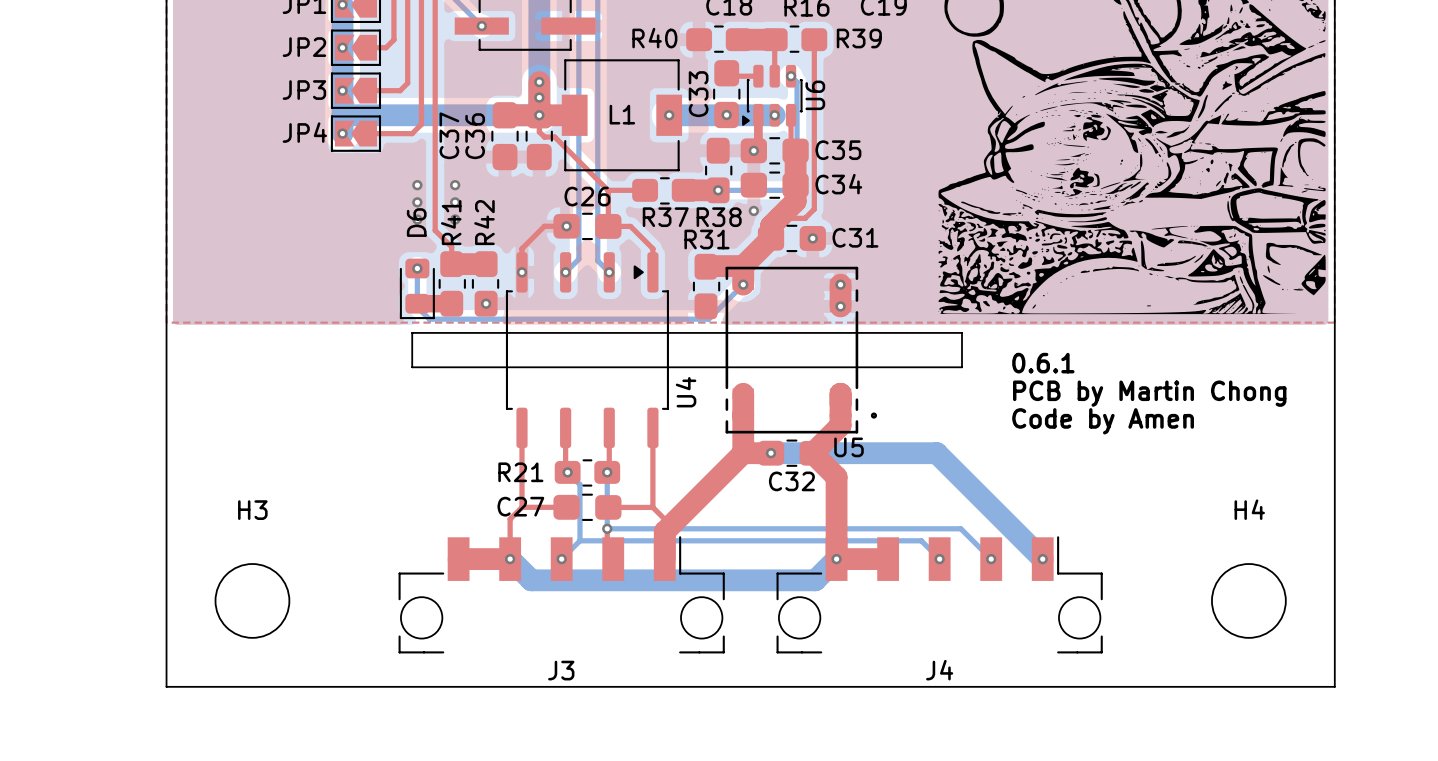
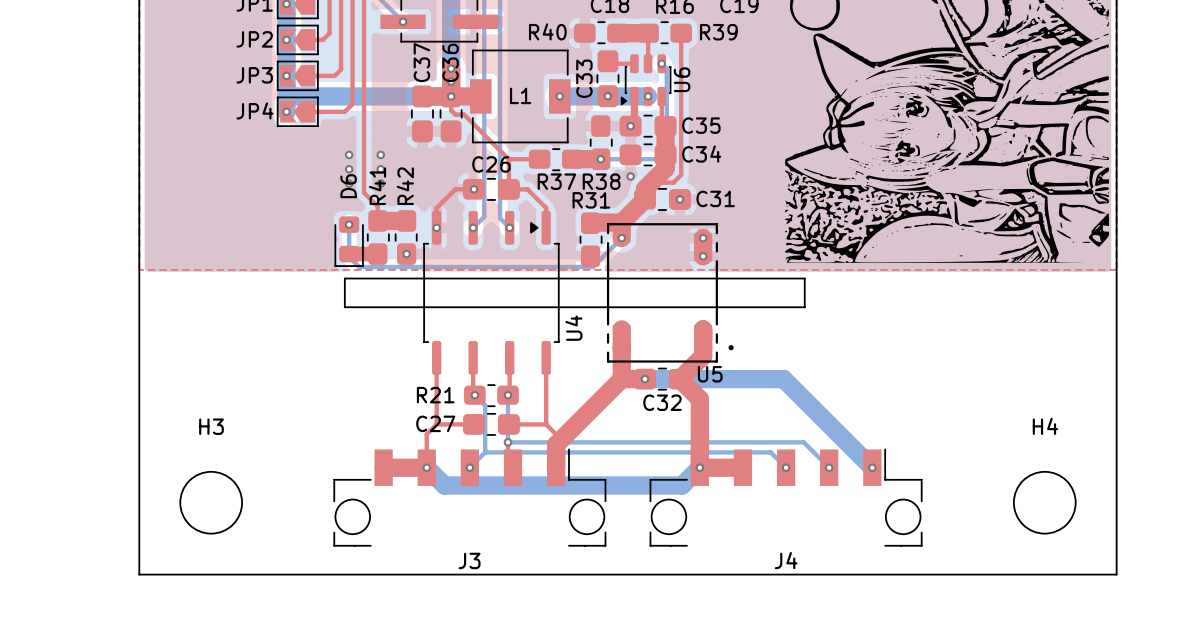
C37 name position: C37 (449, 135) -> C37 (421, 62)
C36 name position: C36 (475, 136) -> C36 (450, 62)
text: 0.6.1 (1043, 363) -> none
text: PCB by Martin Chong (1149, 393) -> none
text: Code by Amen (1103, 421) -> none

